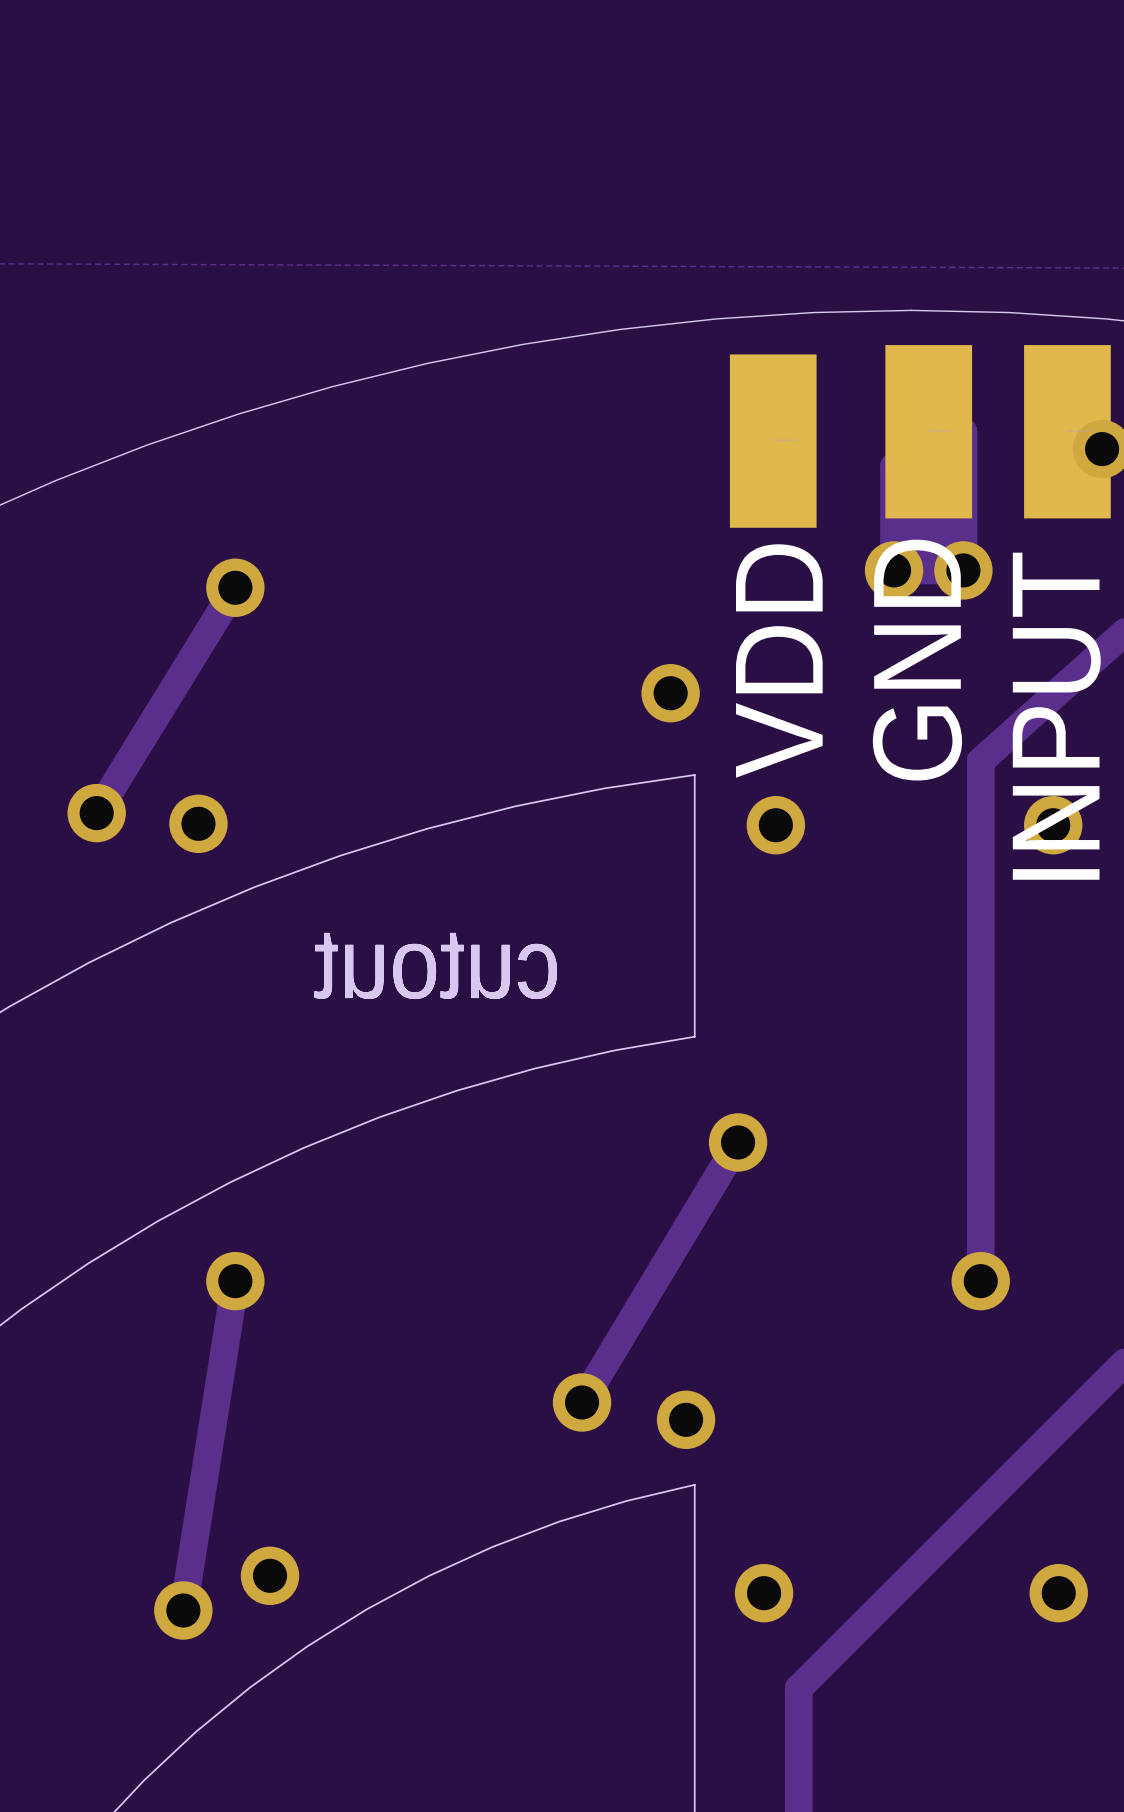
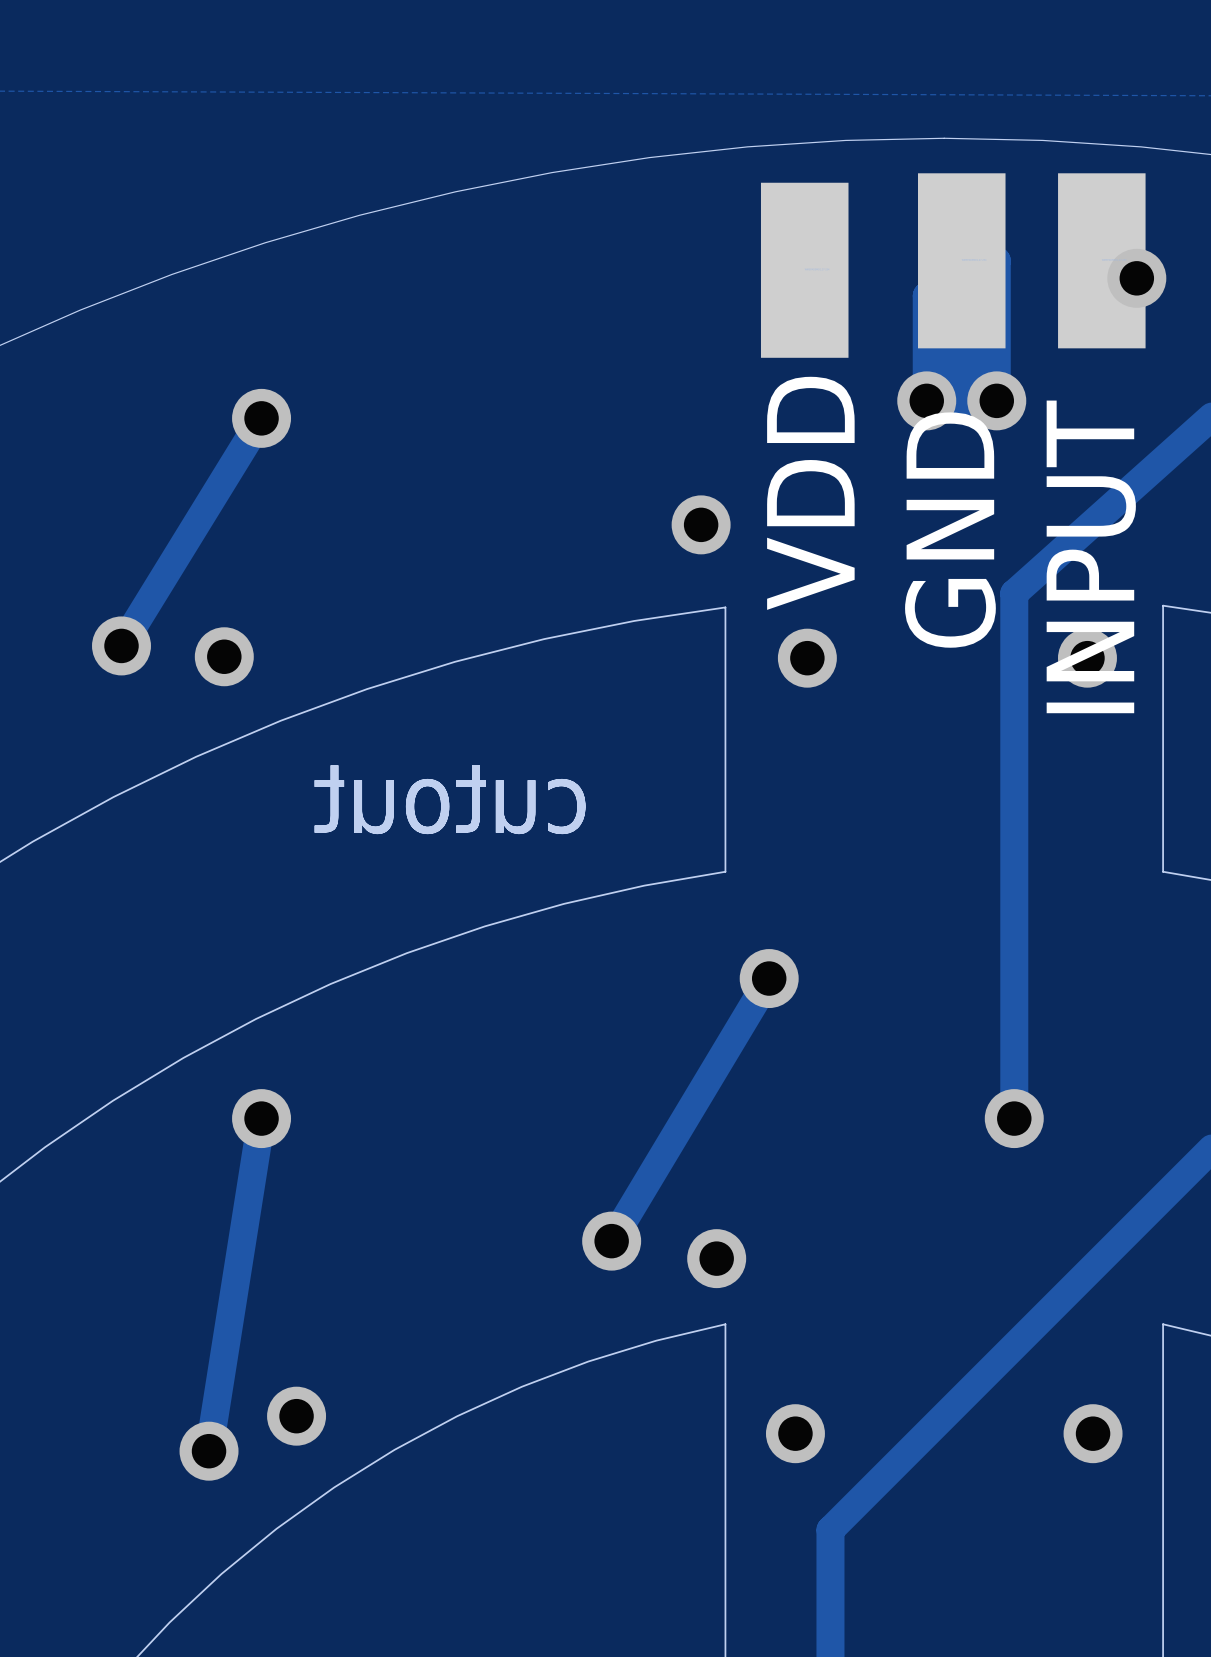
GND name position: GND (917, 660) -> GND (950, 530)

